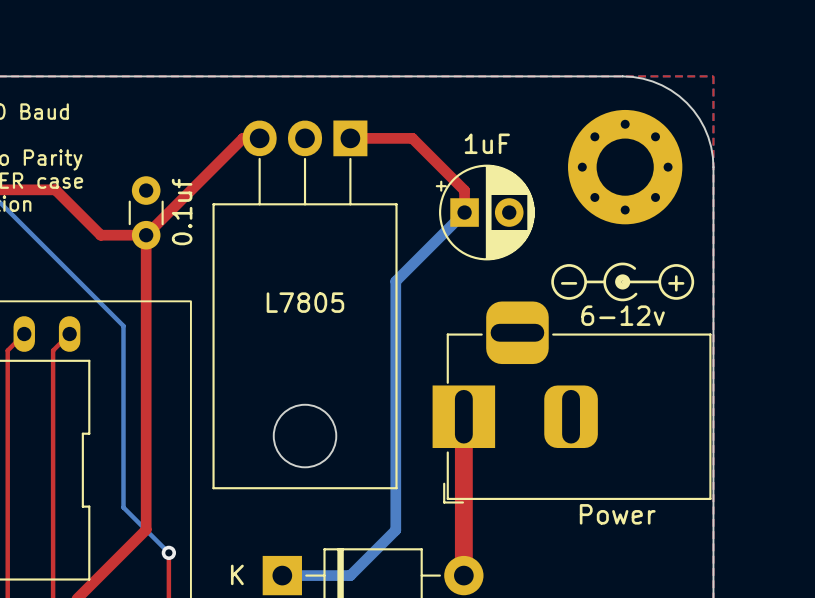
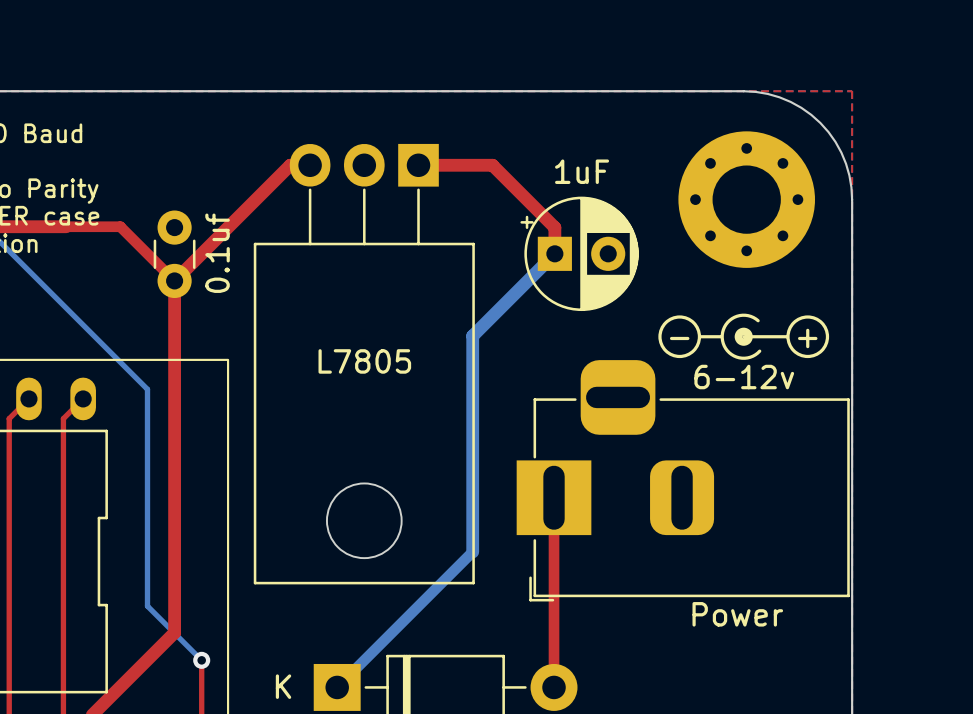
top track: (55, 189) (100, 235) (146, 235) -> (66, 226) (120, 226) (174, 280)
top track width: thick (463, 416) (463, 575) -> thin (554, 497) (554, 687)
bottom track: (395, 462) (395, 530) (350, 575) (282, 575) -> (472, 551) (337, 687)

